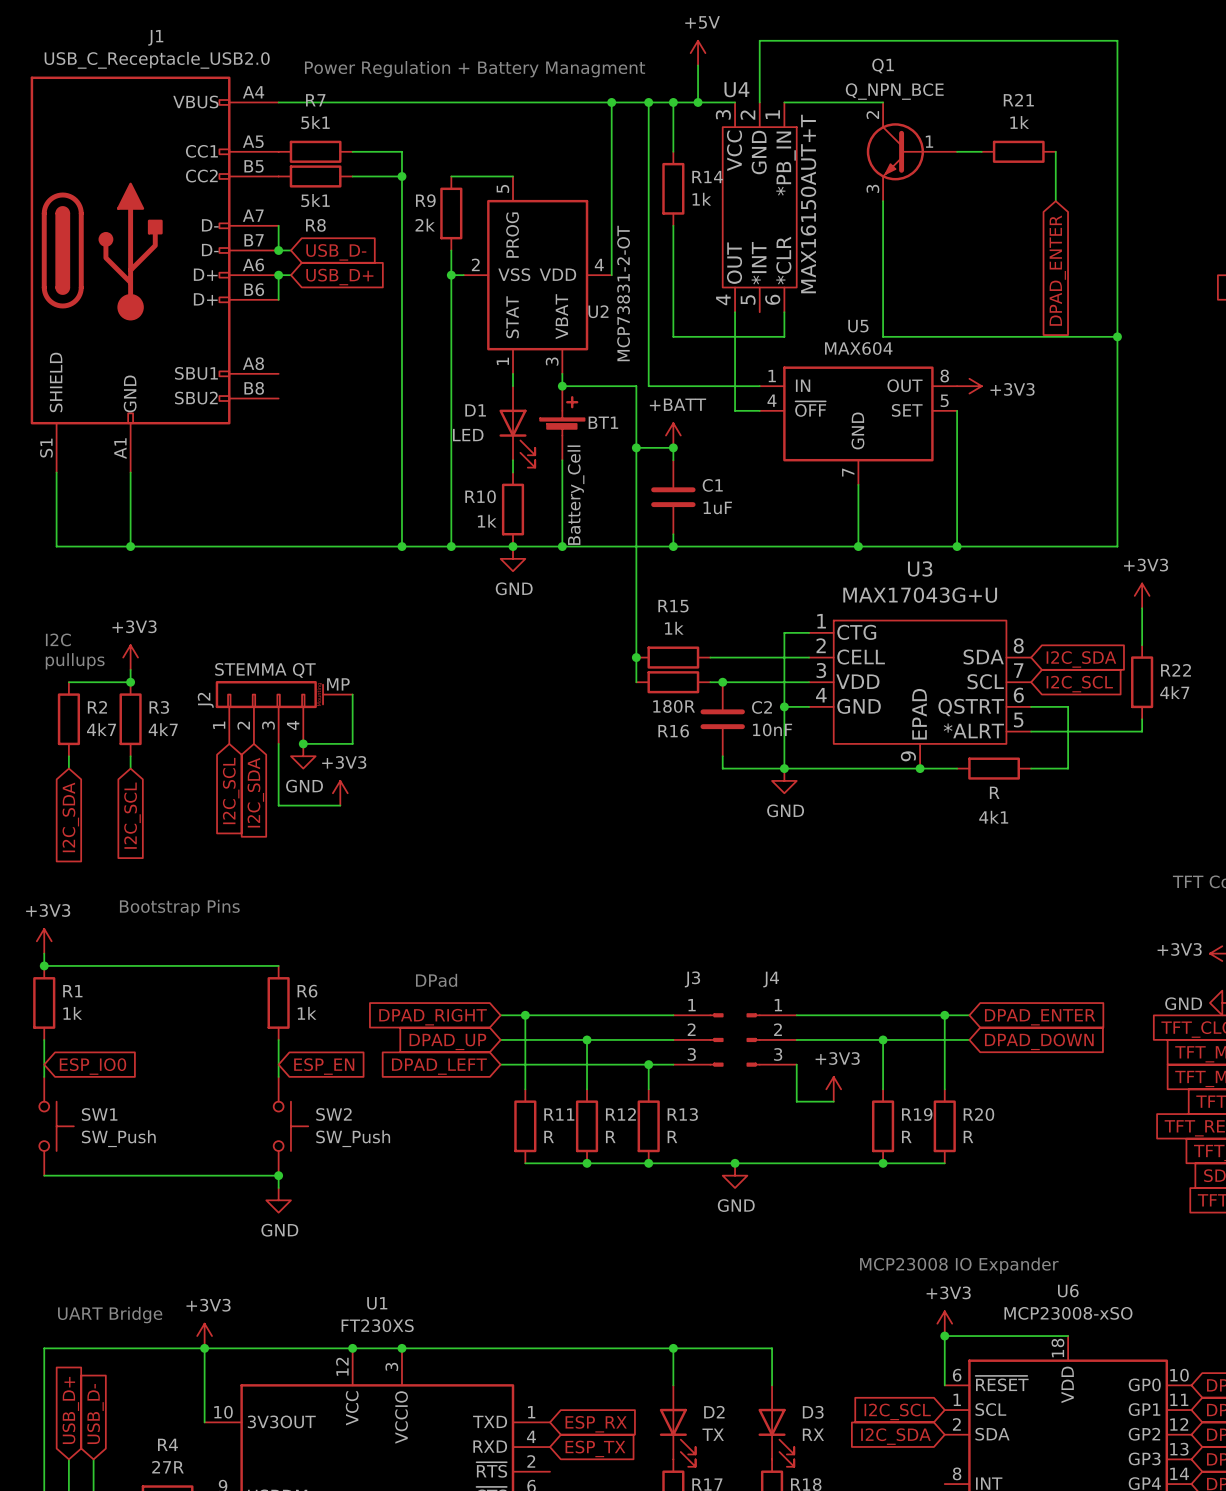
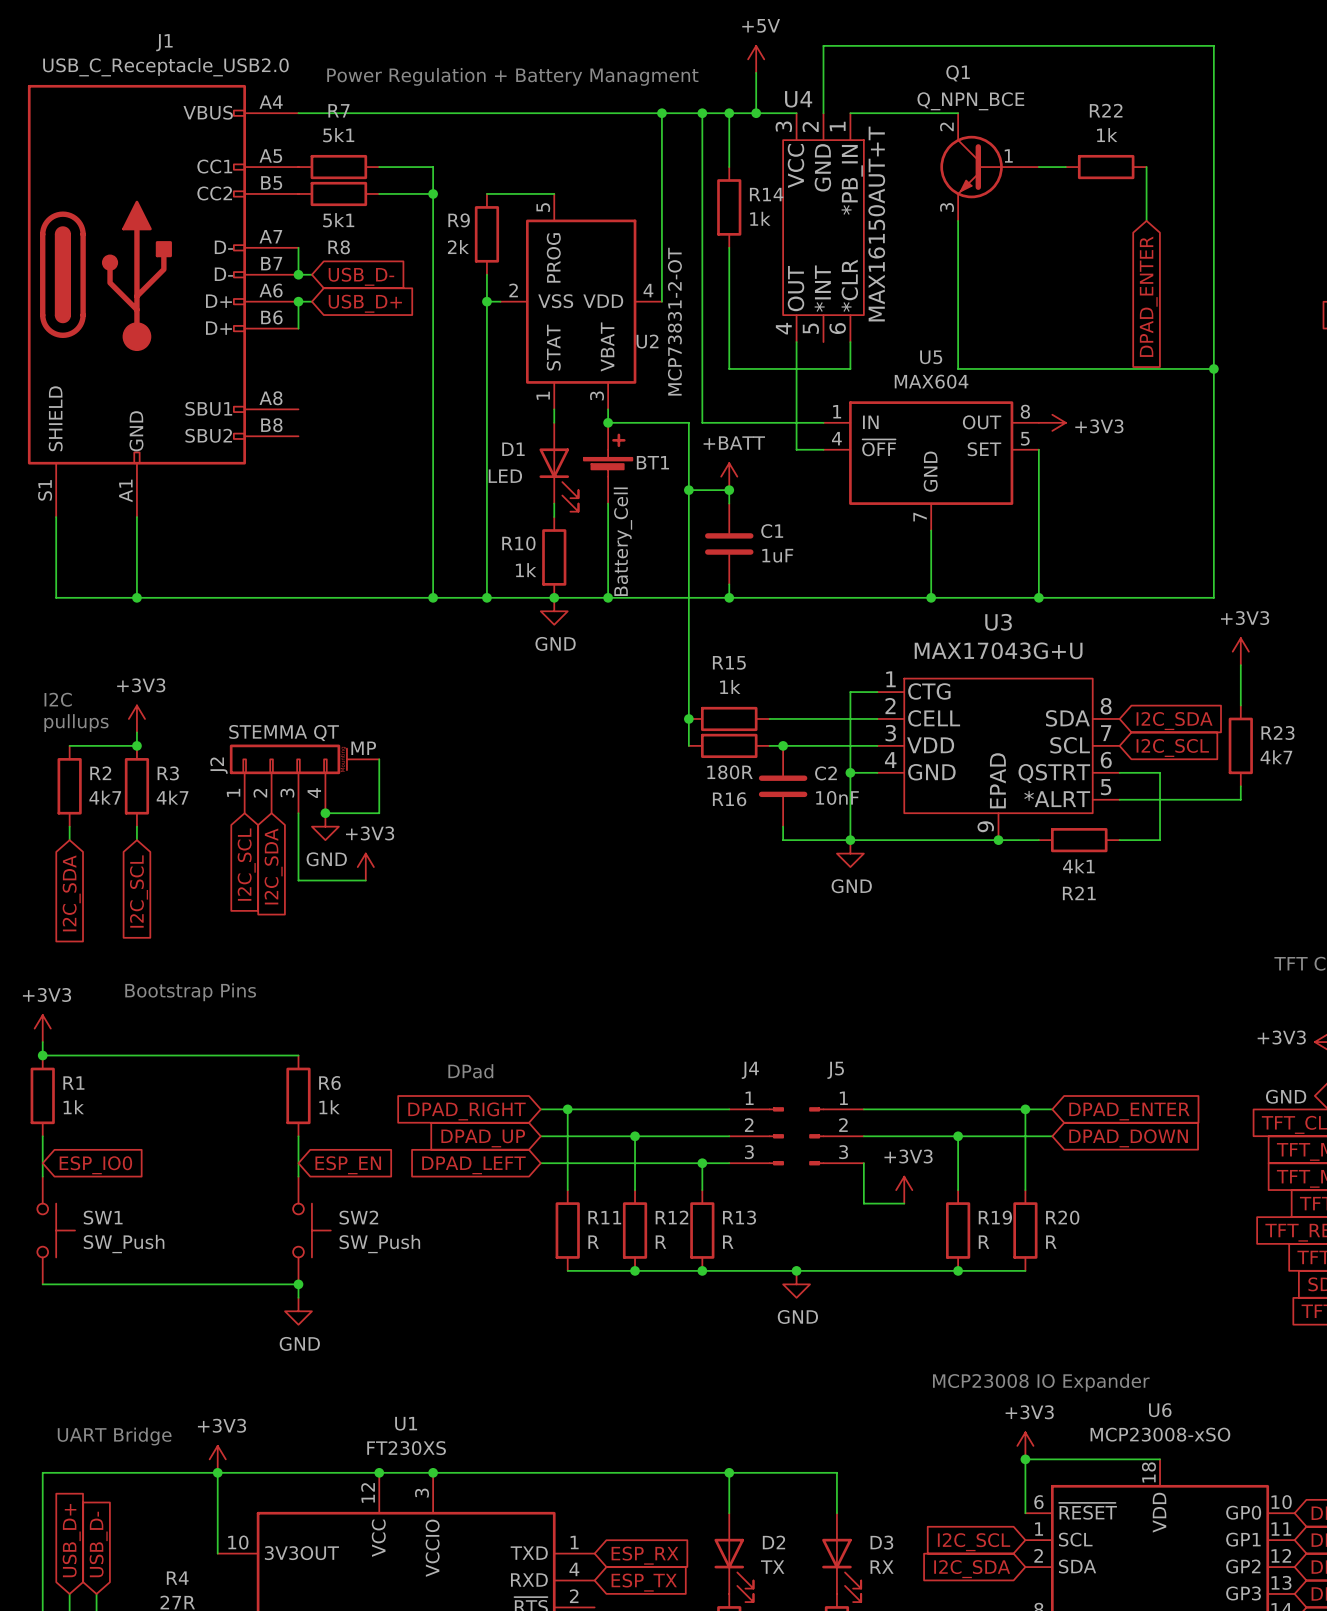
R21 name: R21 (1018, 100) -> R22 (1106, 110)
R22 name: R22 (1176, 670) -> R23 (1277, 733)
4k1 value: R (994, 792) -> 4k1 (1078, 866)
4k1 name: 4k1 (993, 817) -> R21 (1079, 893)
J3 name: J3 (692, 979) -> J4 (750, 1070)
J4 name: J4 (771, 979) -> J5 (835, 1070)

